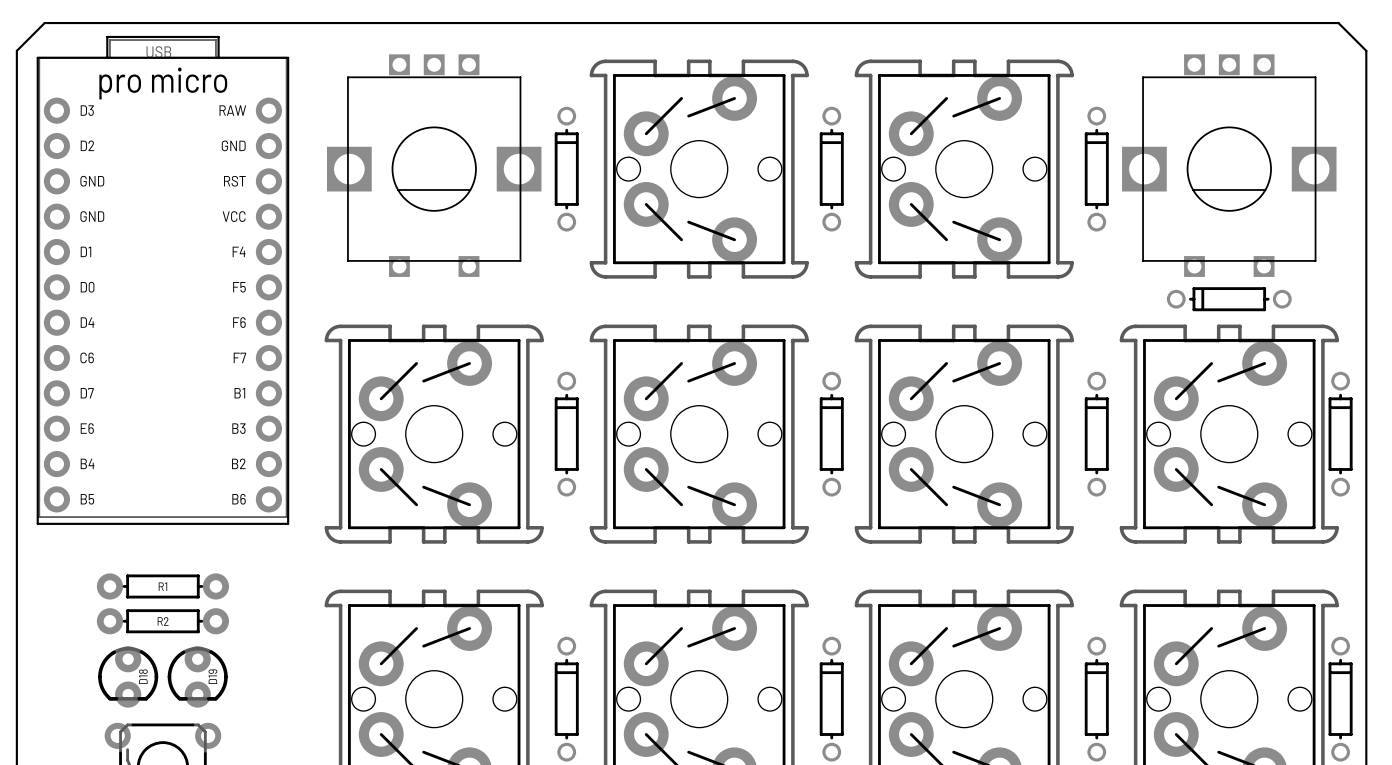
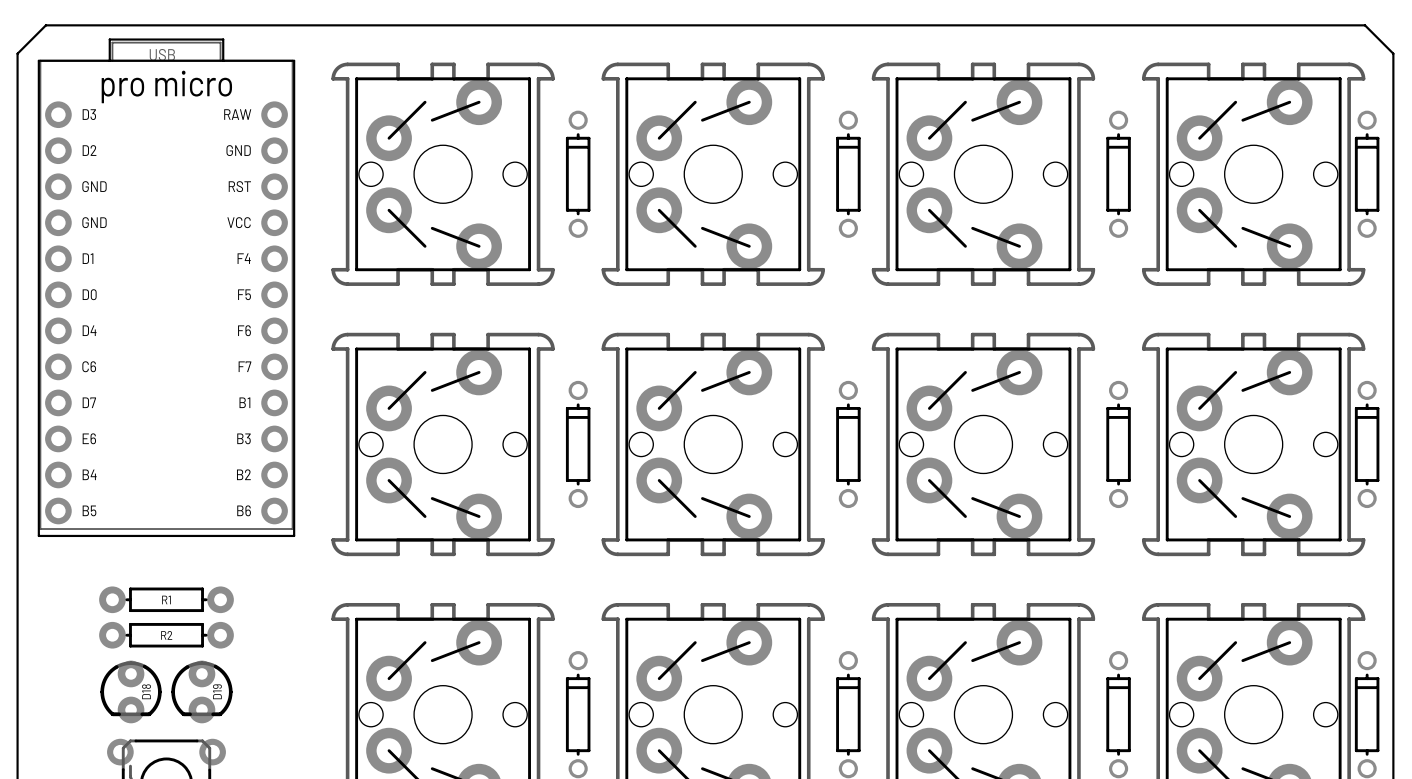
part footprint: [326, 54, 542, 277] -> [331, 62, 555, 286]
part footprint: [1122, 54, 1337, 277] -> [1141, 62, 1366, 286]
part rotation: 0° (1229, 299) -> 90° clockwise (1367, 174)
part position: (1229, 299) -> (1367, 174)

